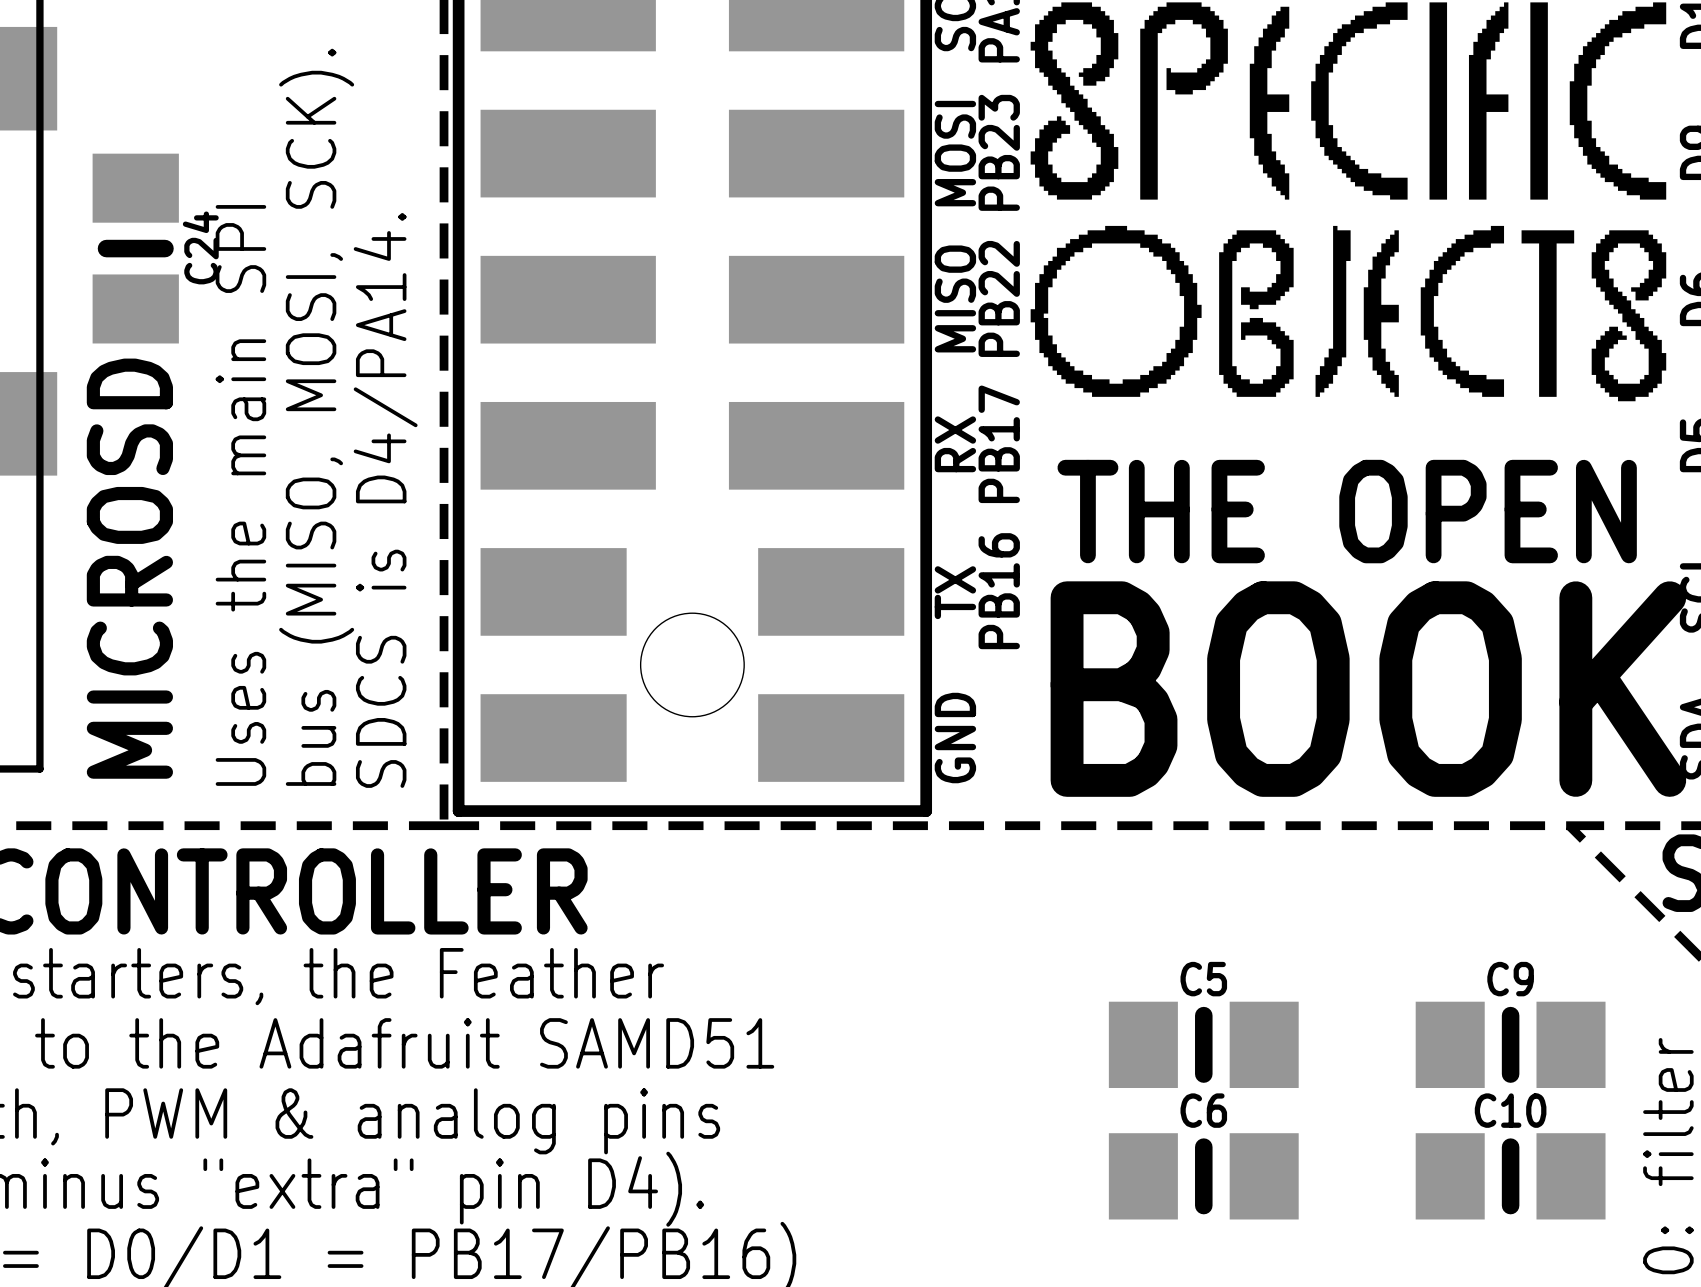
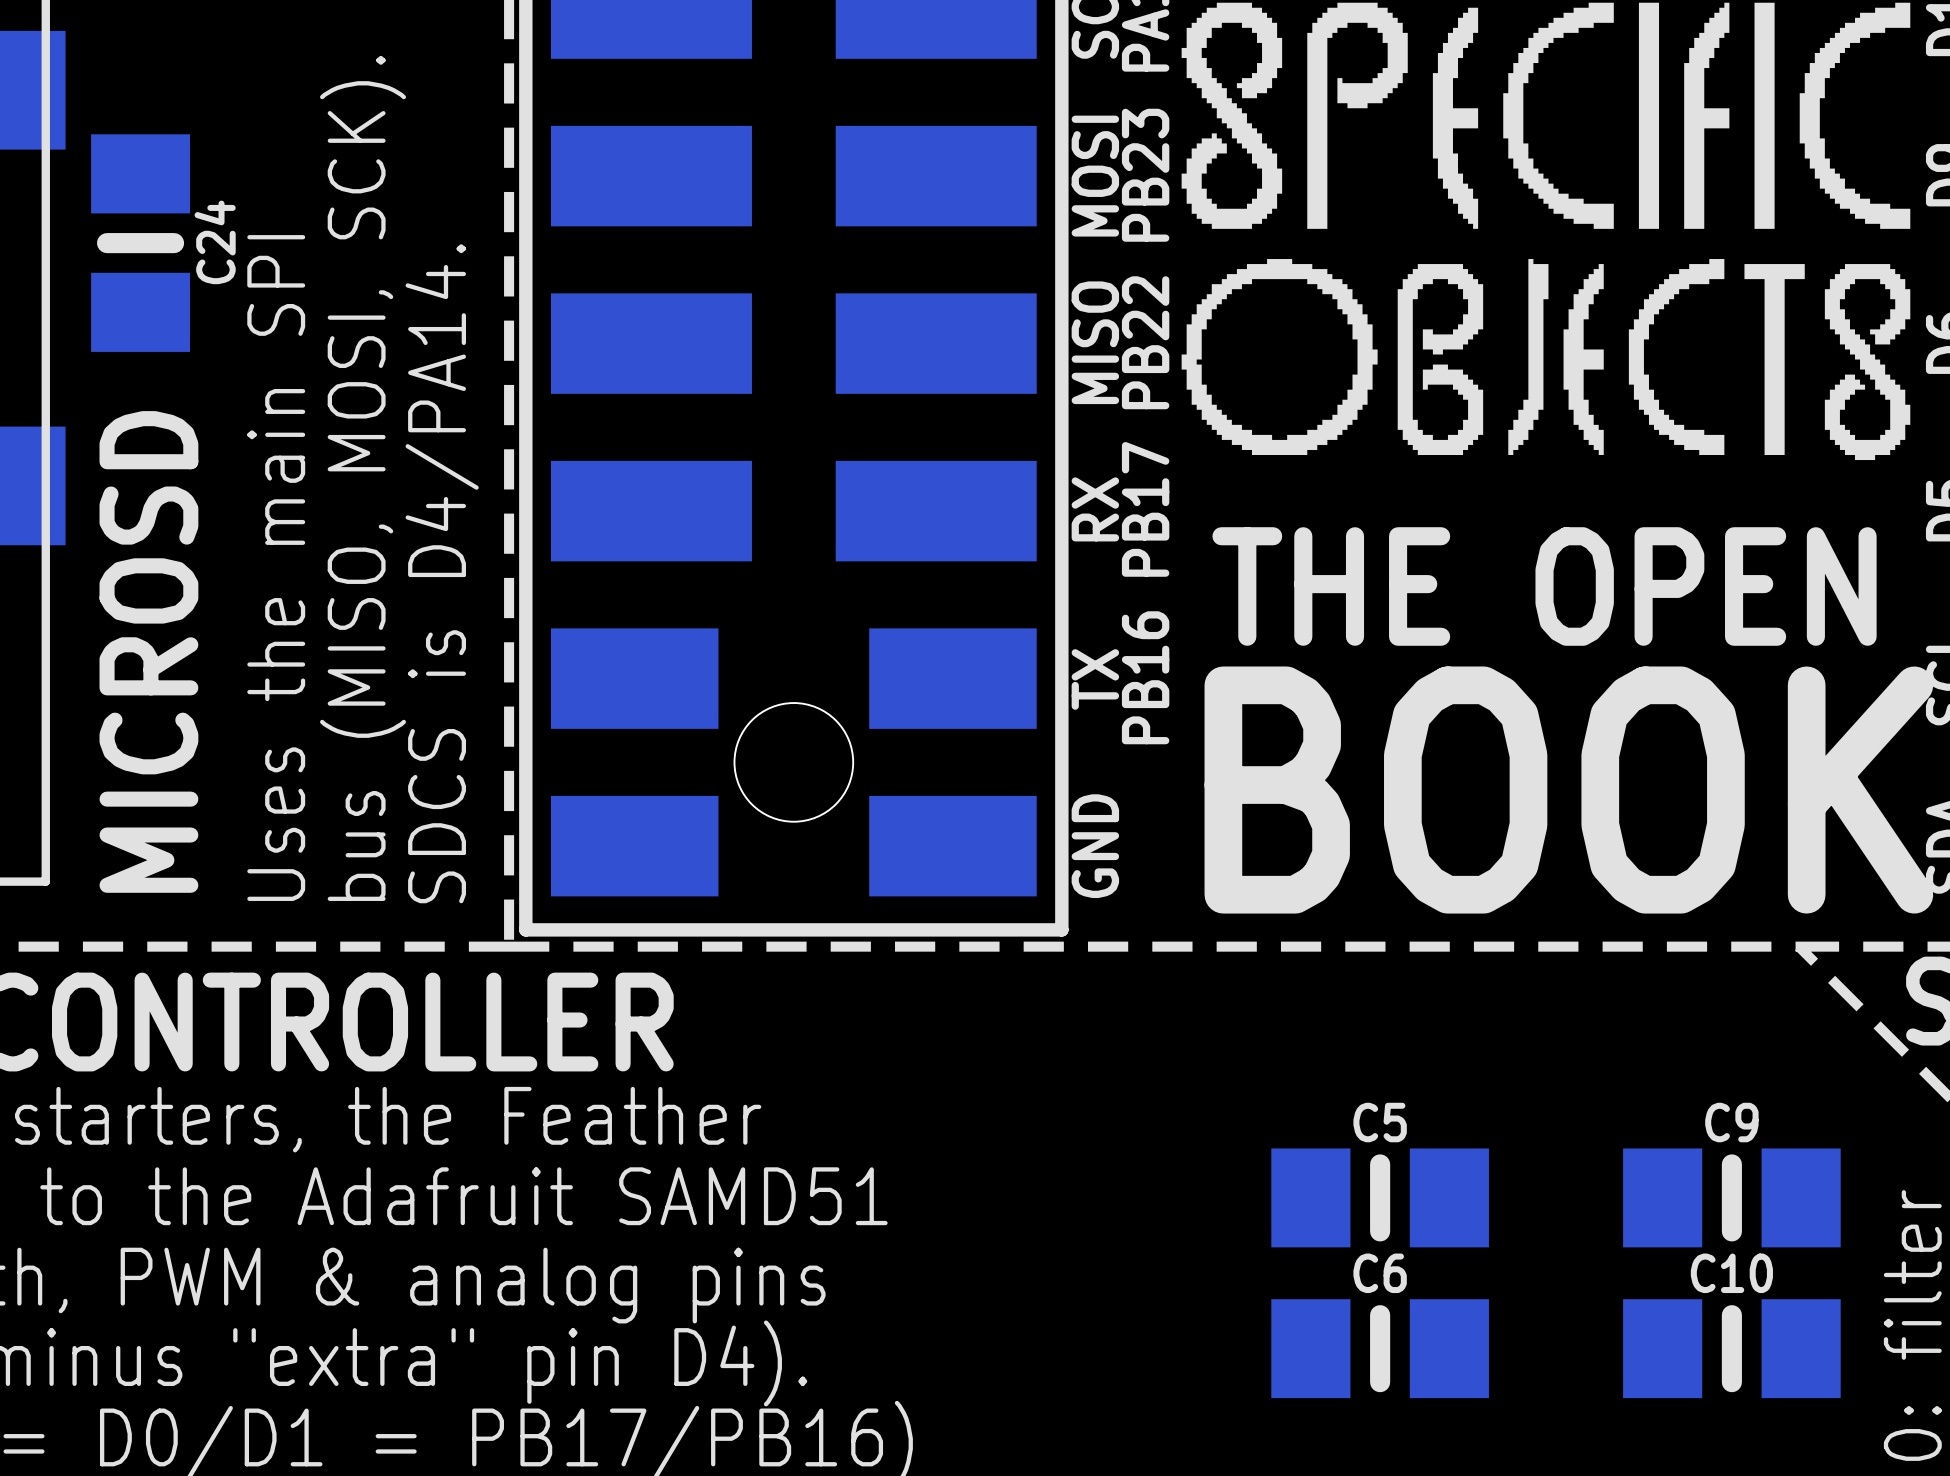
C24 position: (135, 248) -> (140, 243)

